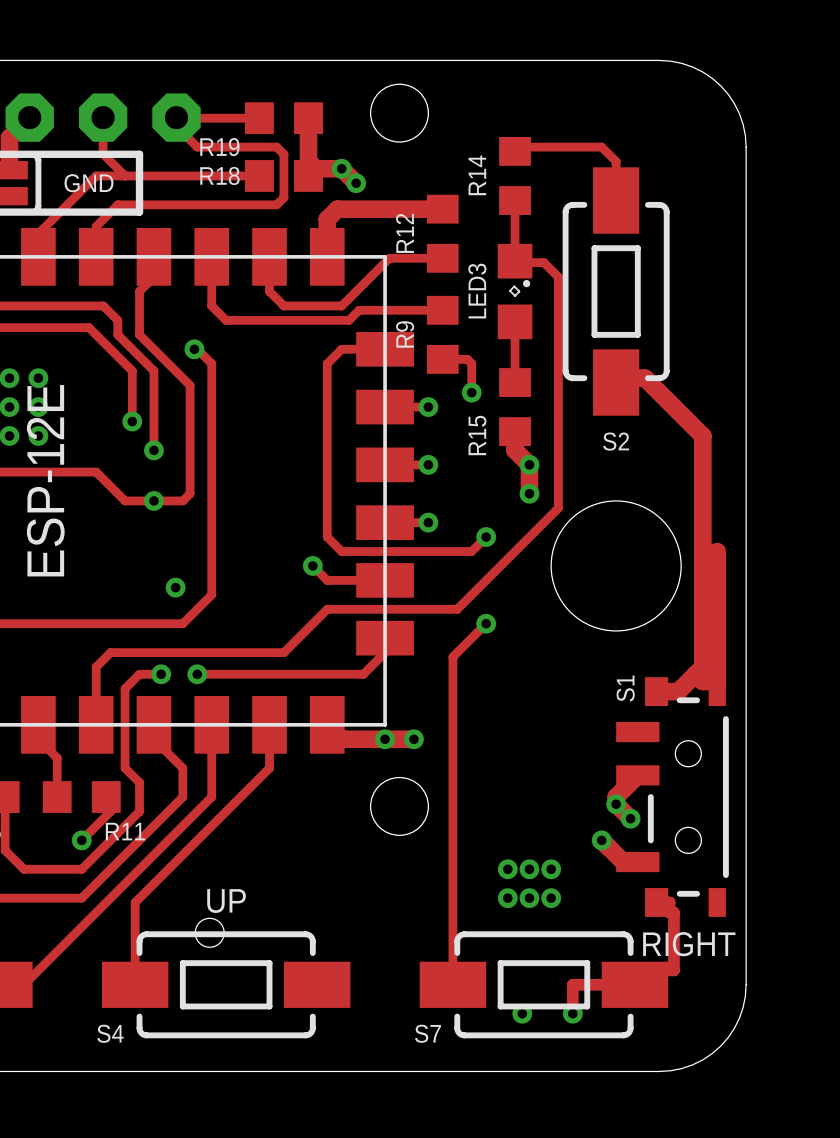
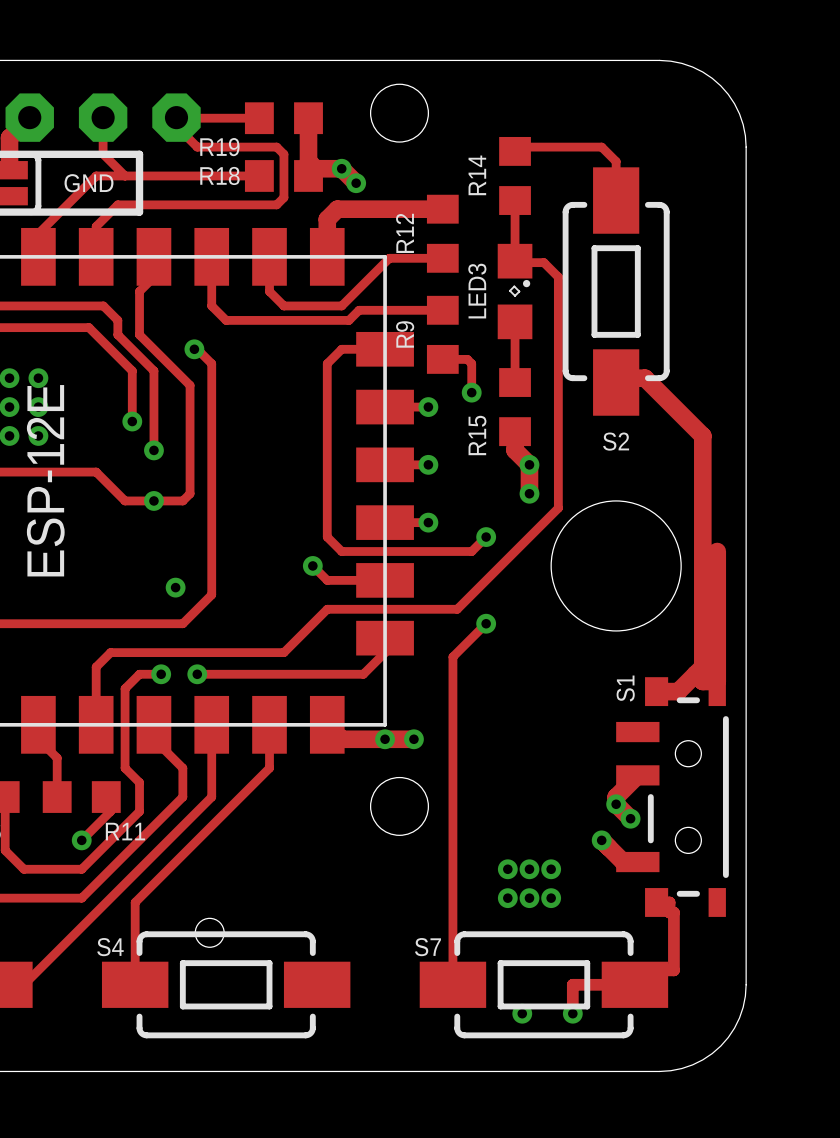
text: UP (226, 901) -> none
text: RIGHT (689, 944) -> none
S4 name position: S4 (110, 1033) -> S4 (110, 947)
S7 name position: S7 (427, 1033) -> S7 (427, 947)

